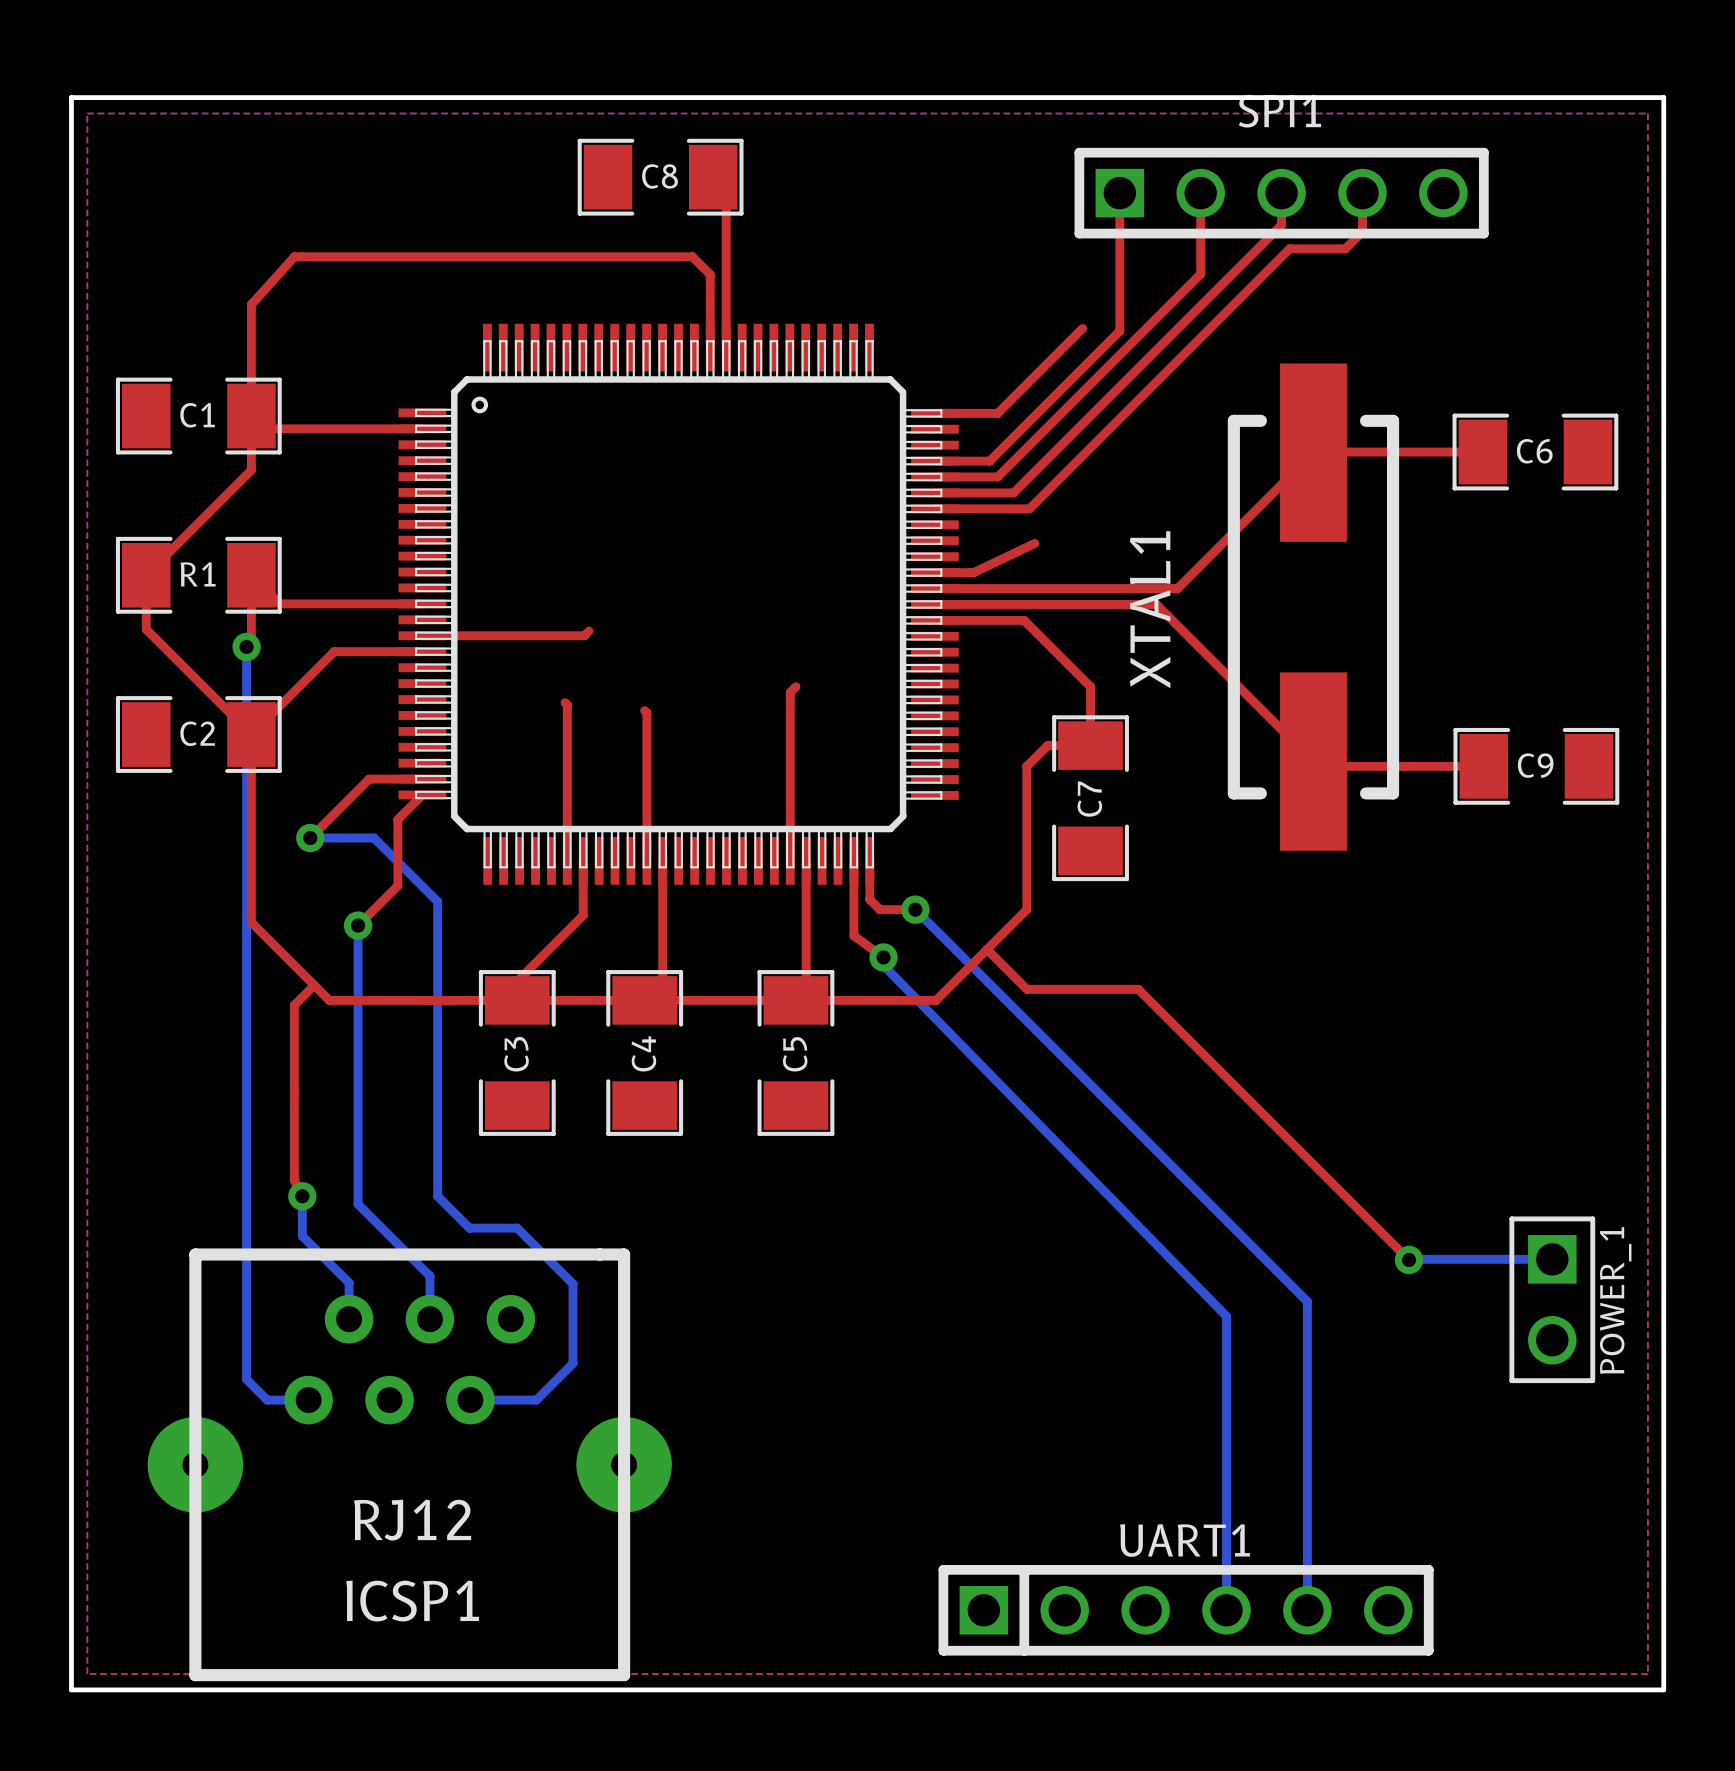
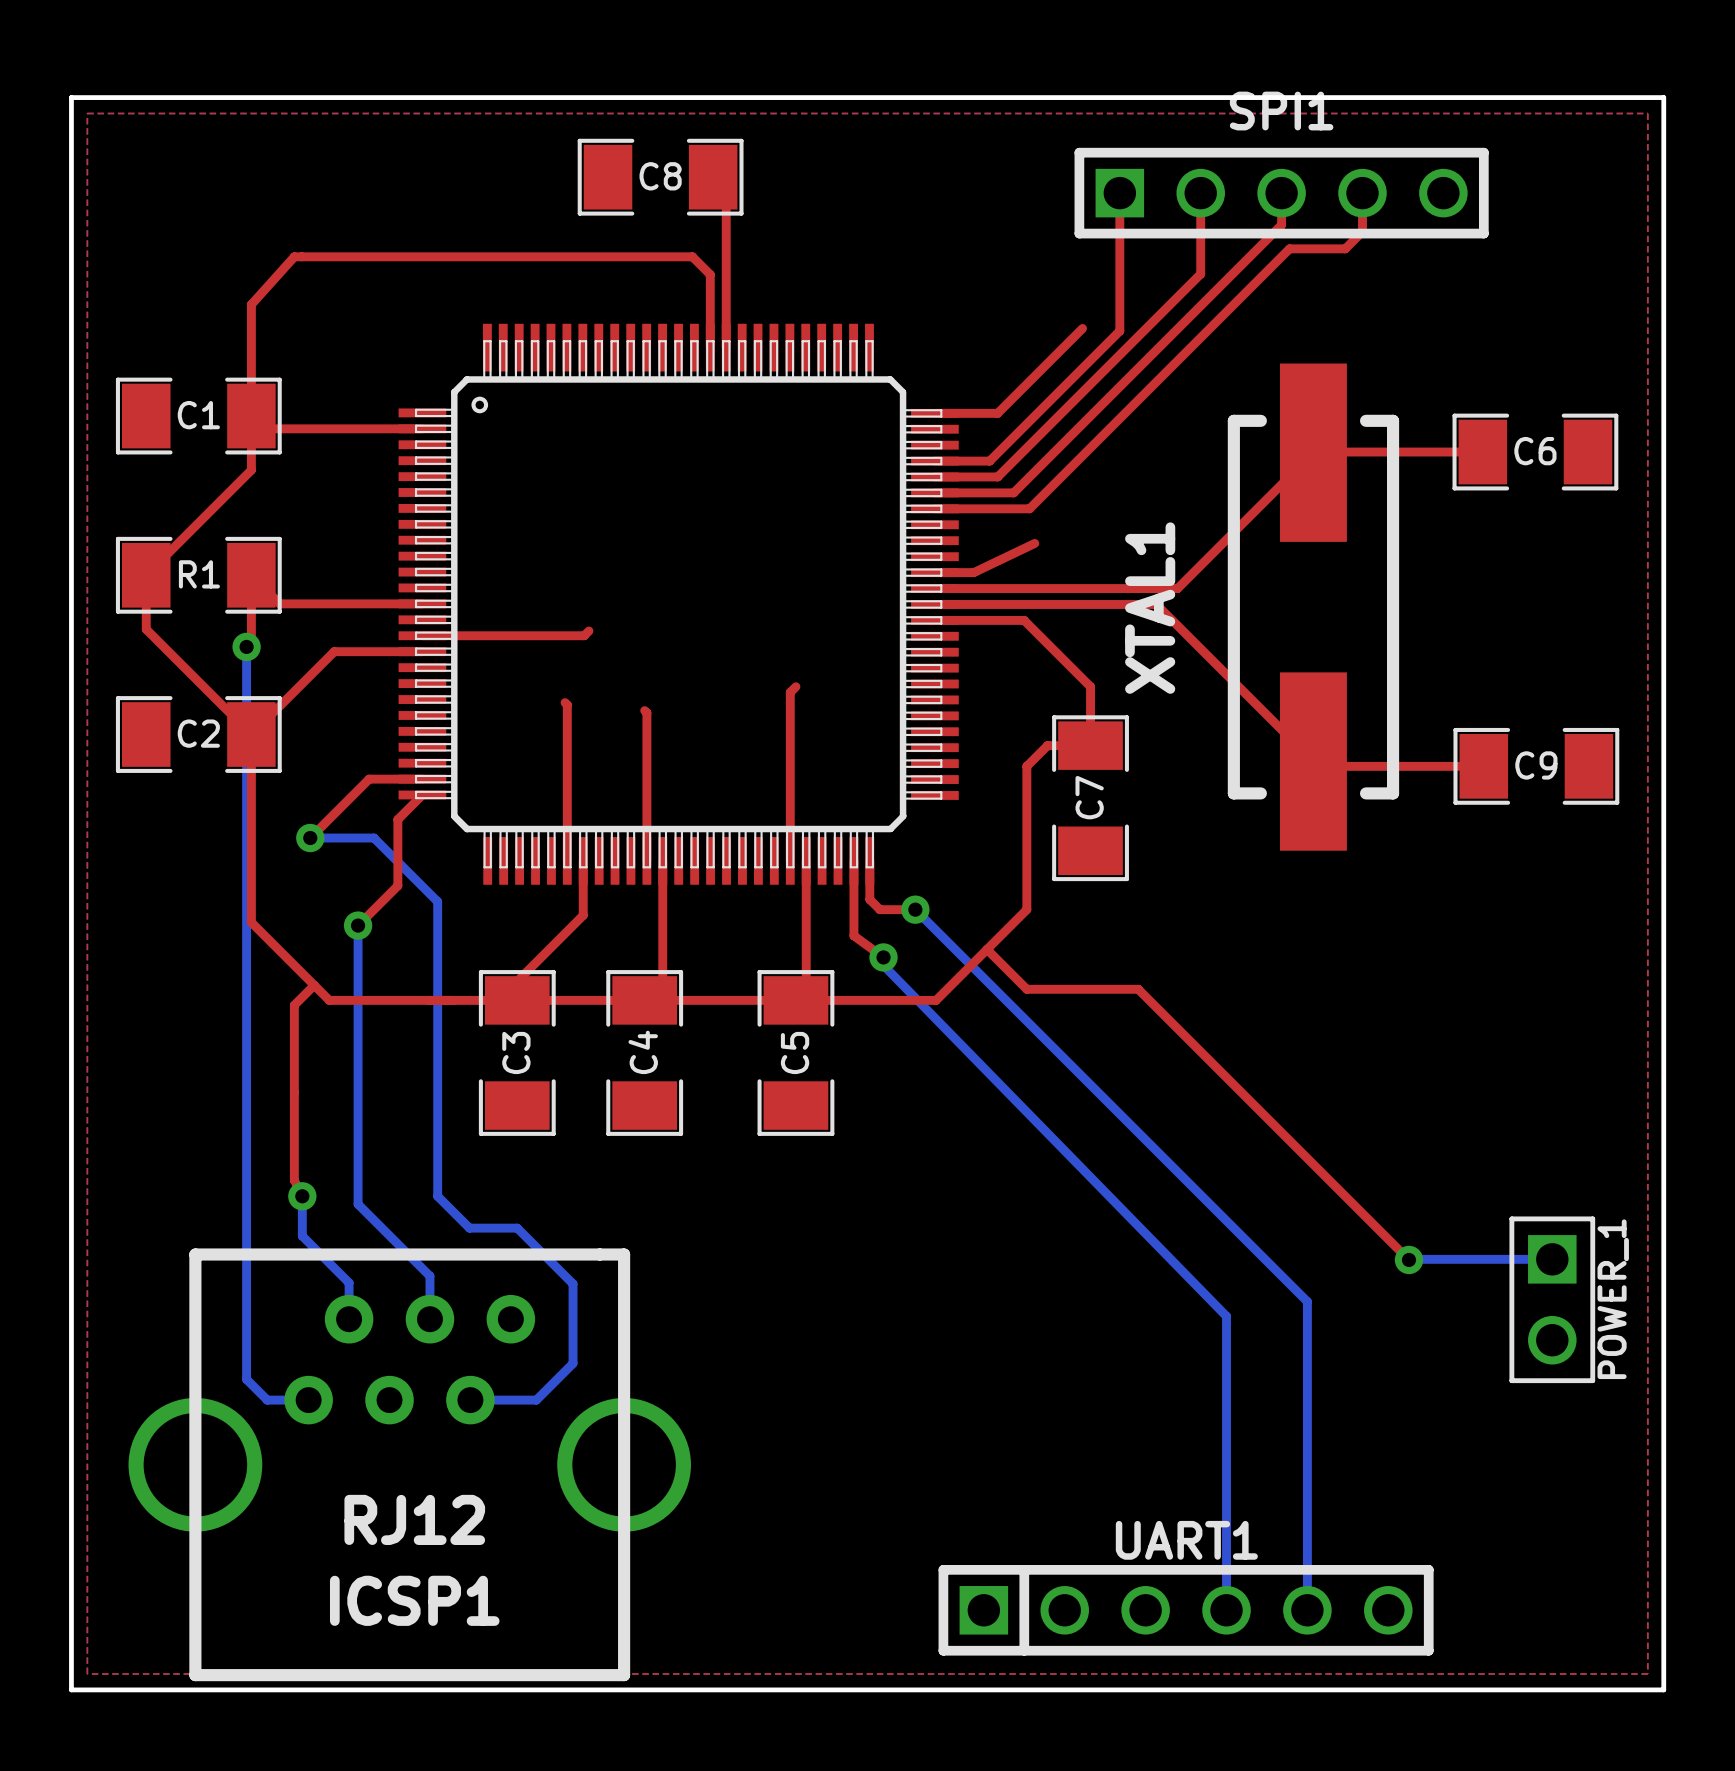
ICSP1 footprint: [147, 1248, 672, 1682] -> [128, 1248, 691, 1682]

